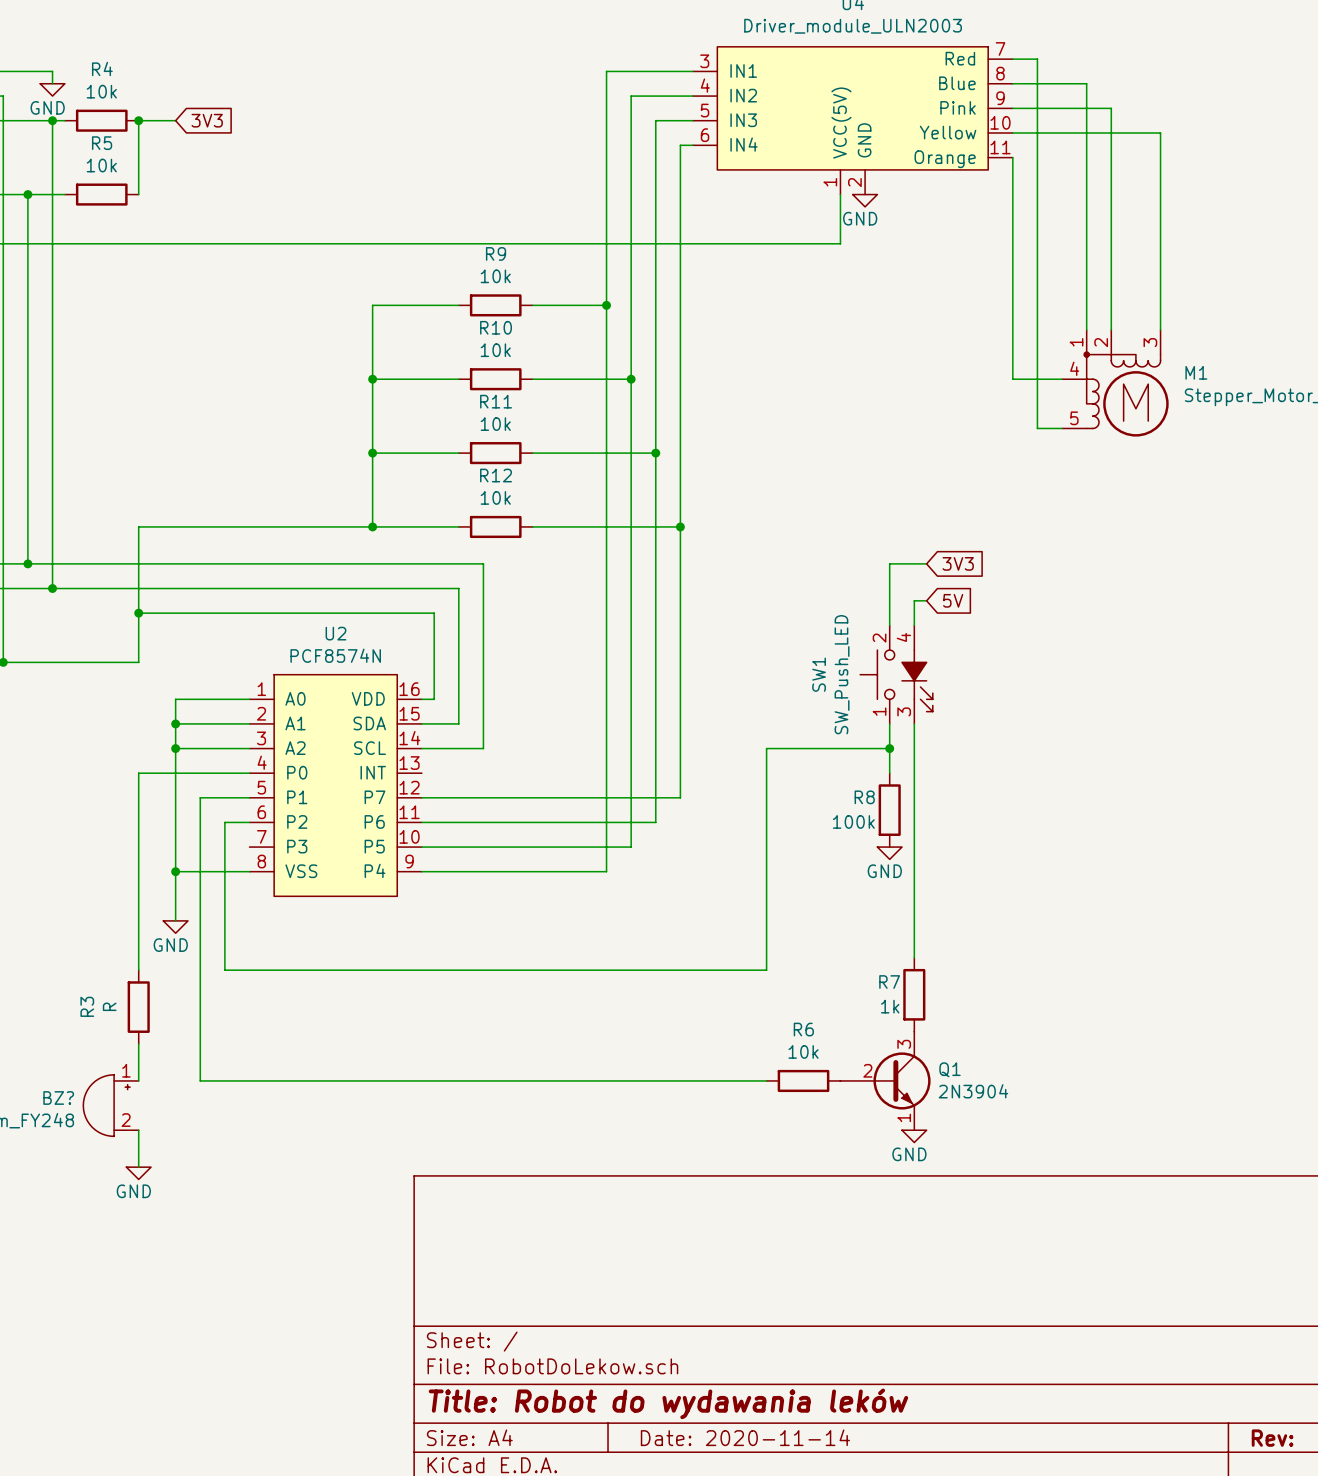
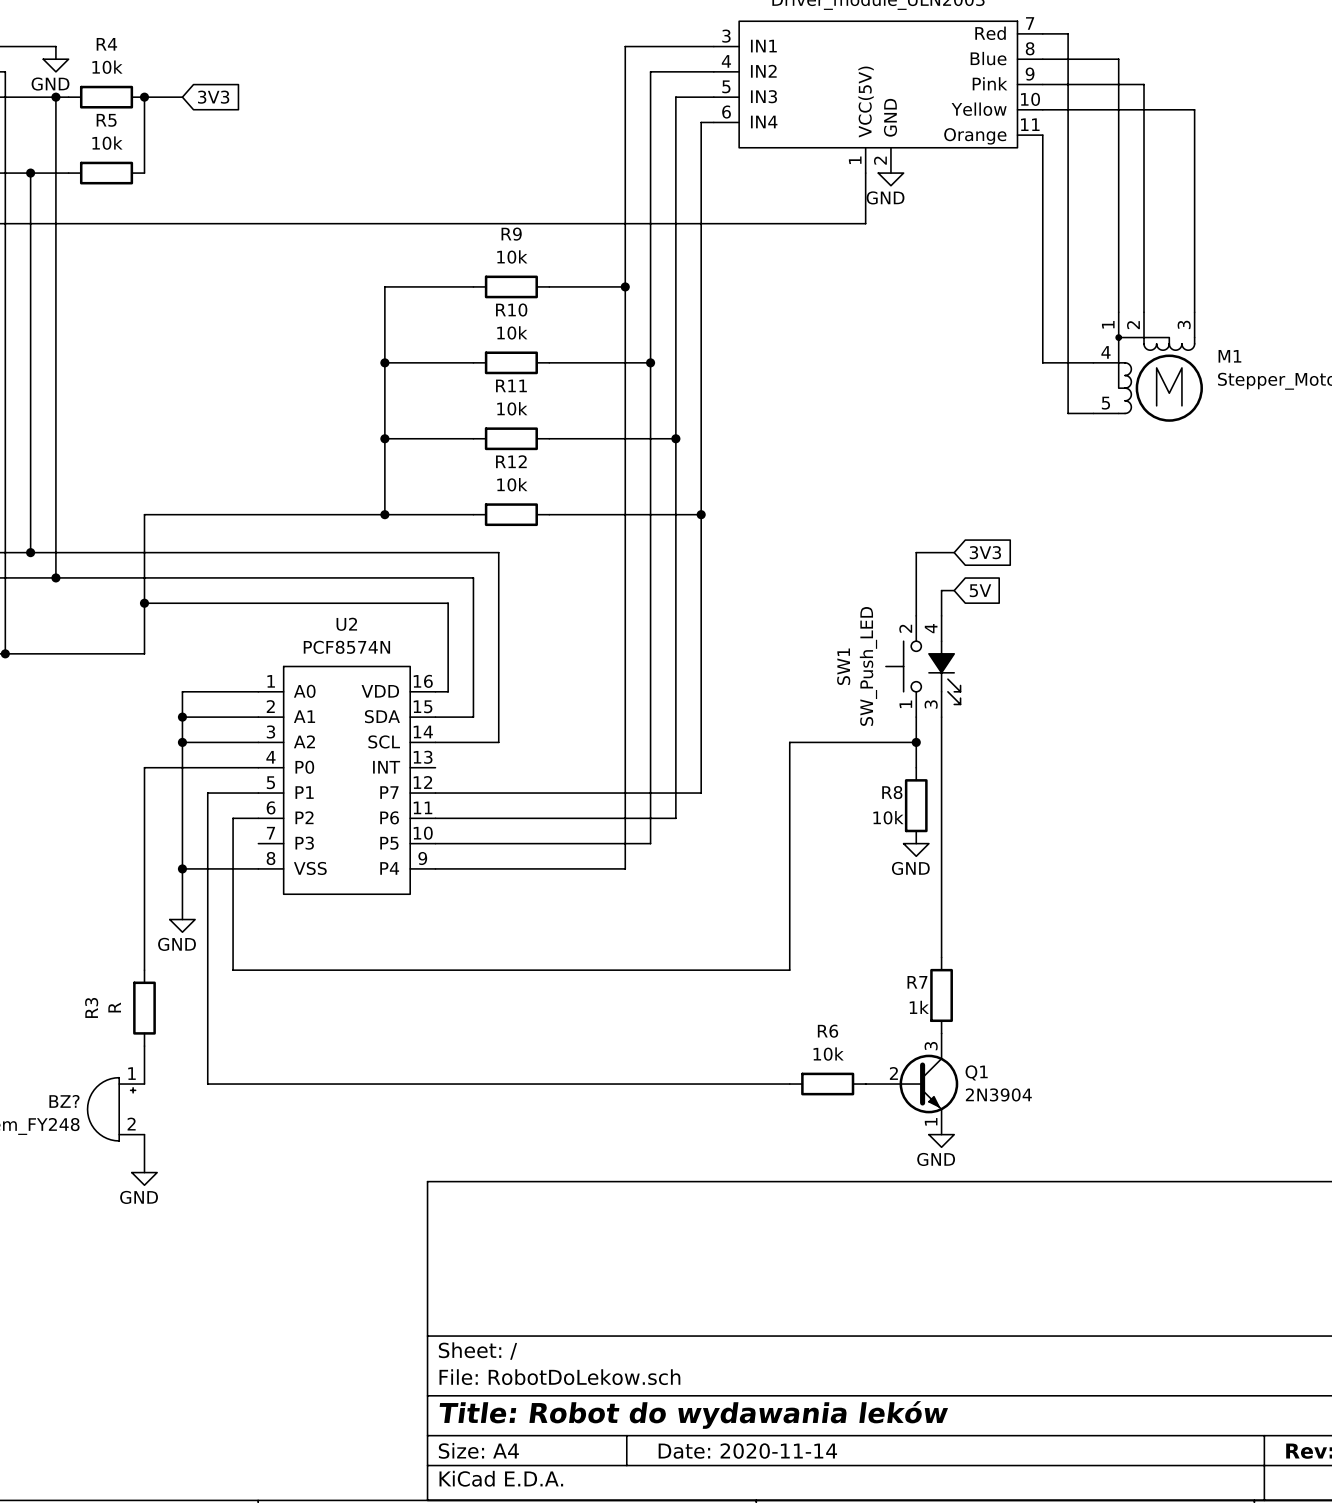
R8 value: 100k (853, 821) -> 10k (888, 817)

